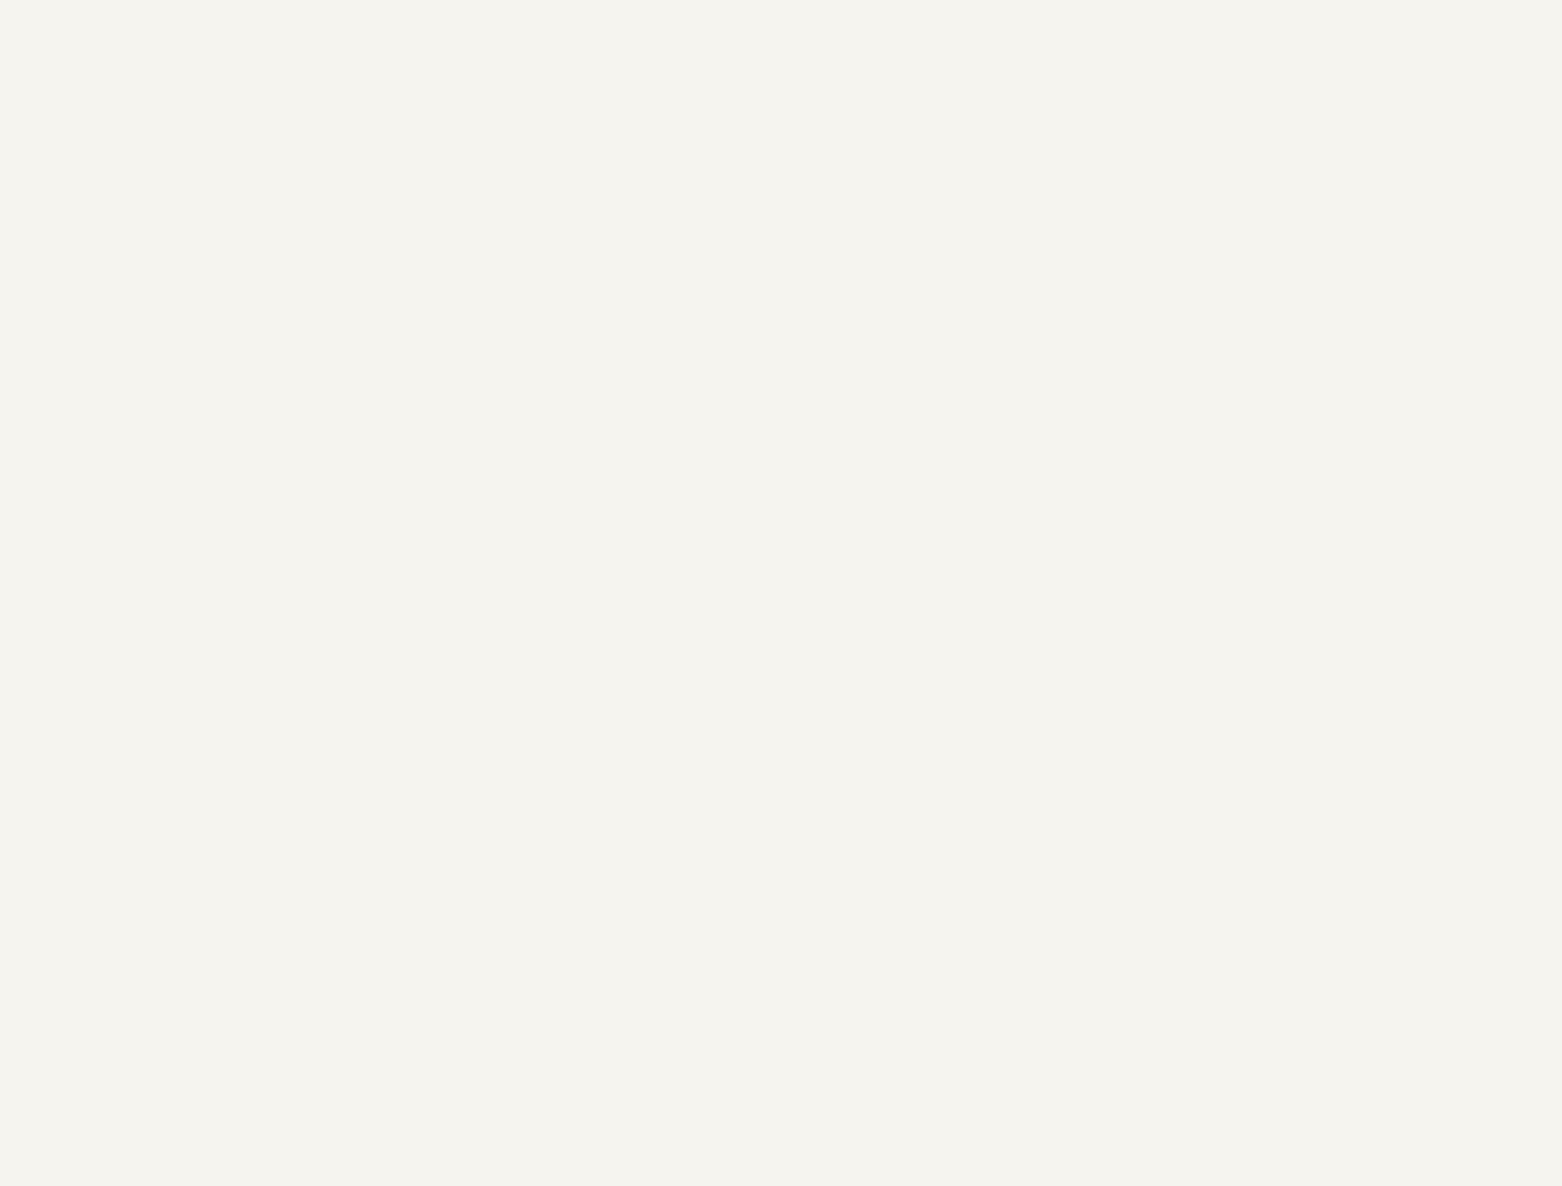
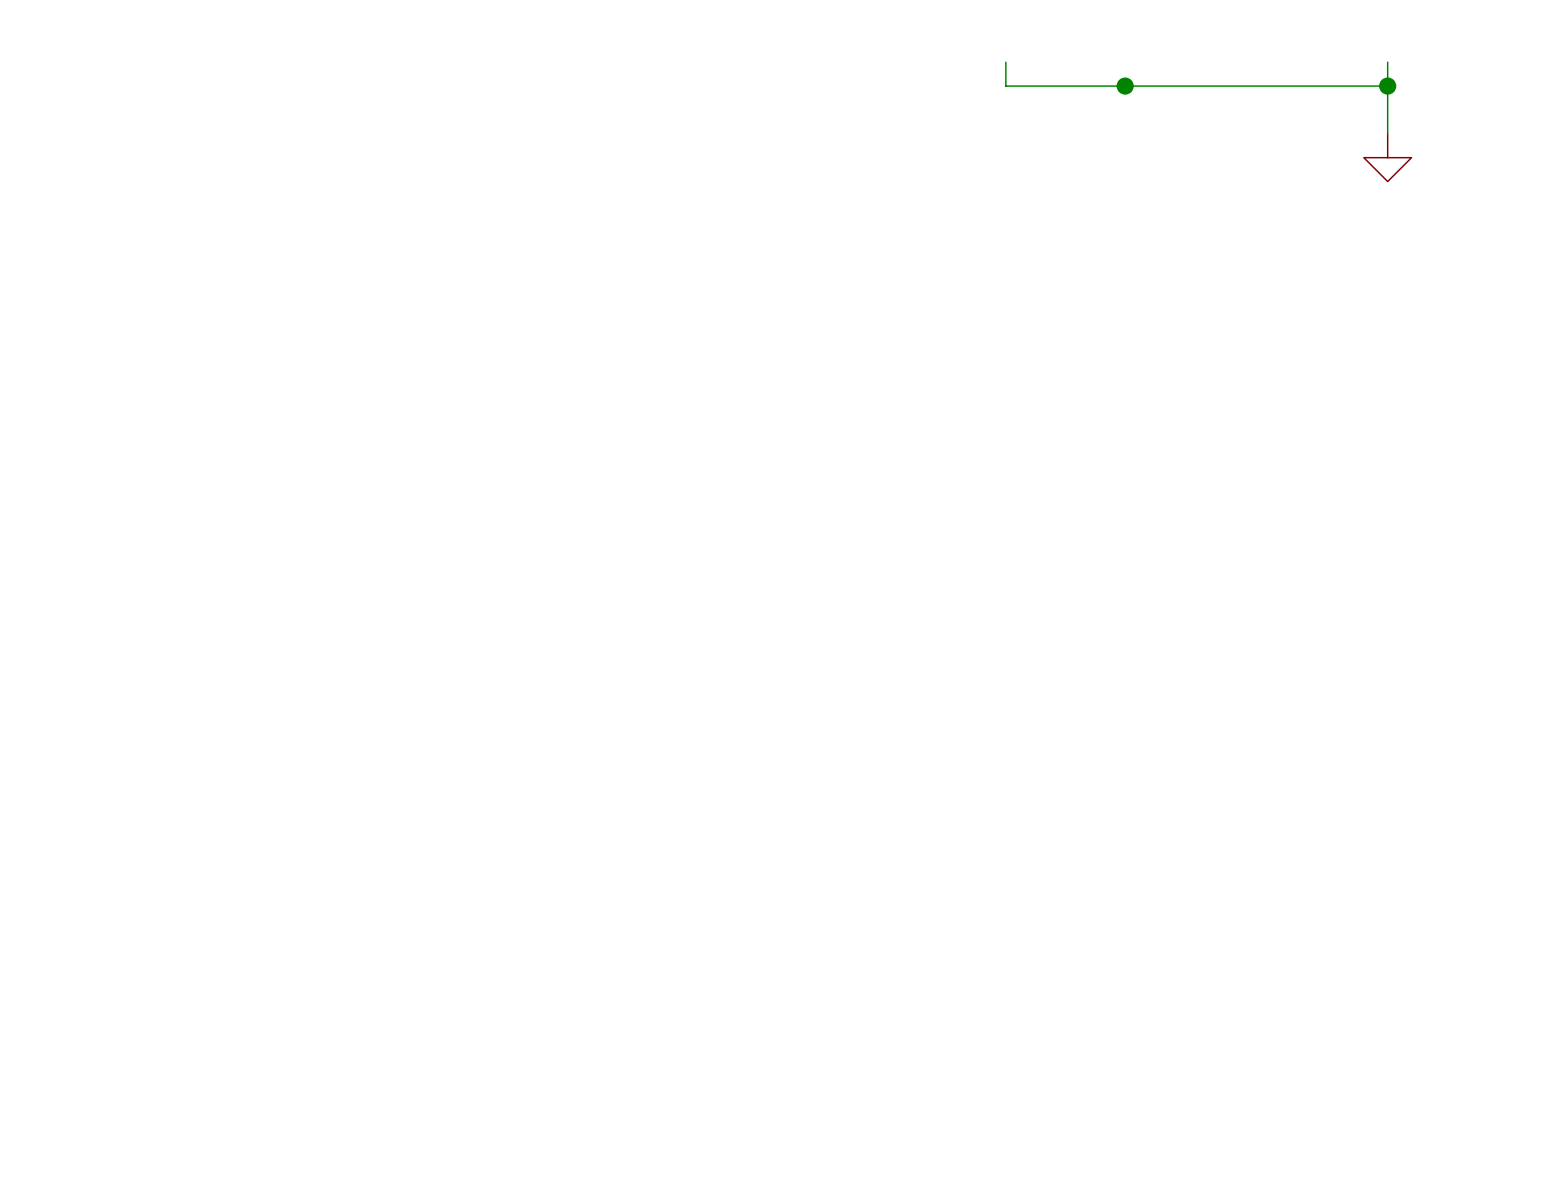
wire: none -> (1005, 62) (1005, 86) (1387, 86)
wire: none -> (1387, 62) (1387, 133)
junction: none -> (1125, 86)
junction: none -> (1387, 86)
power symbol: none -> (1387, 157)

